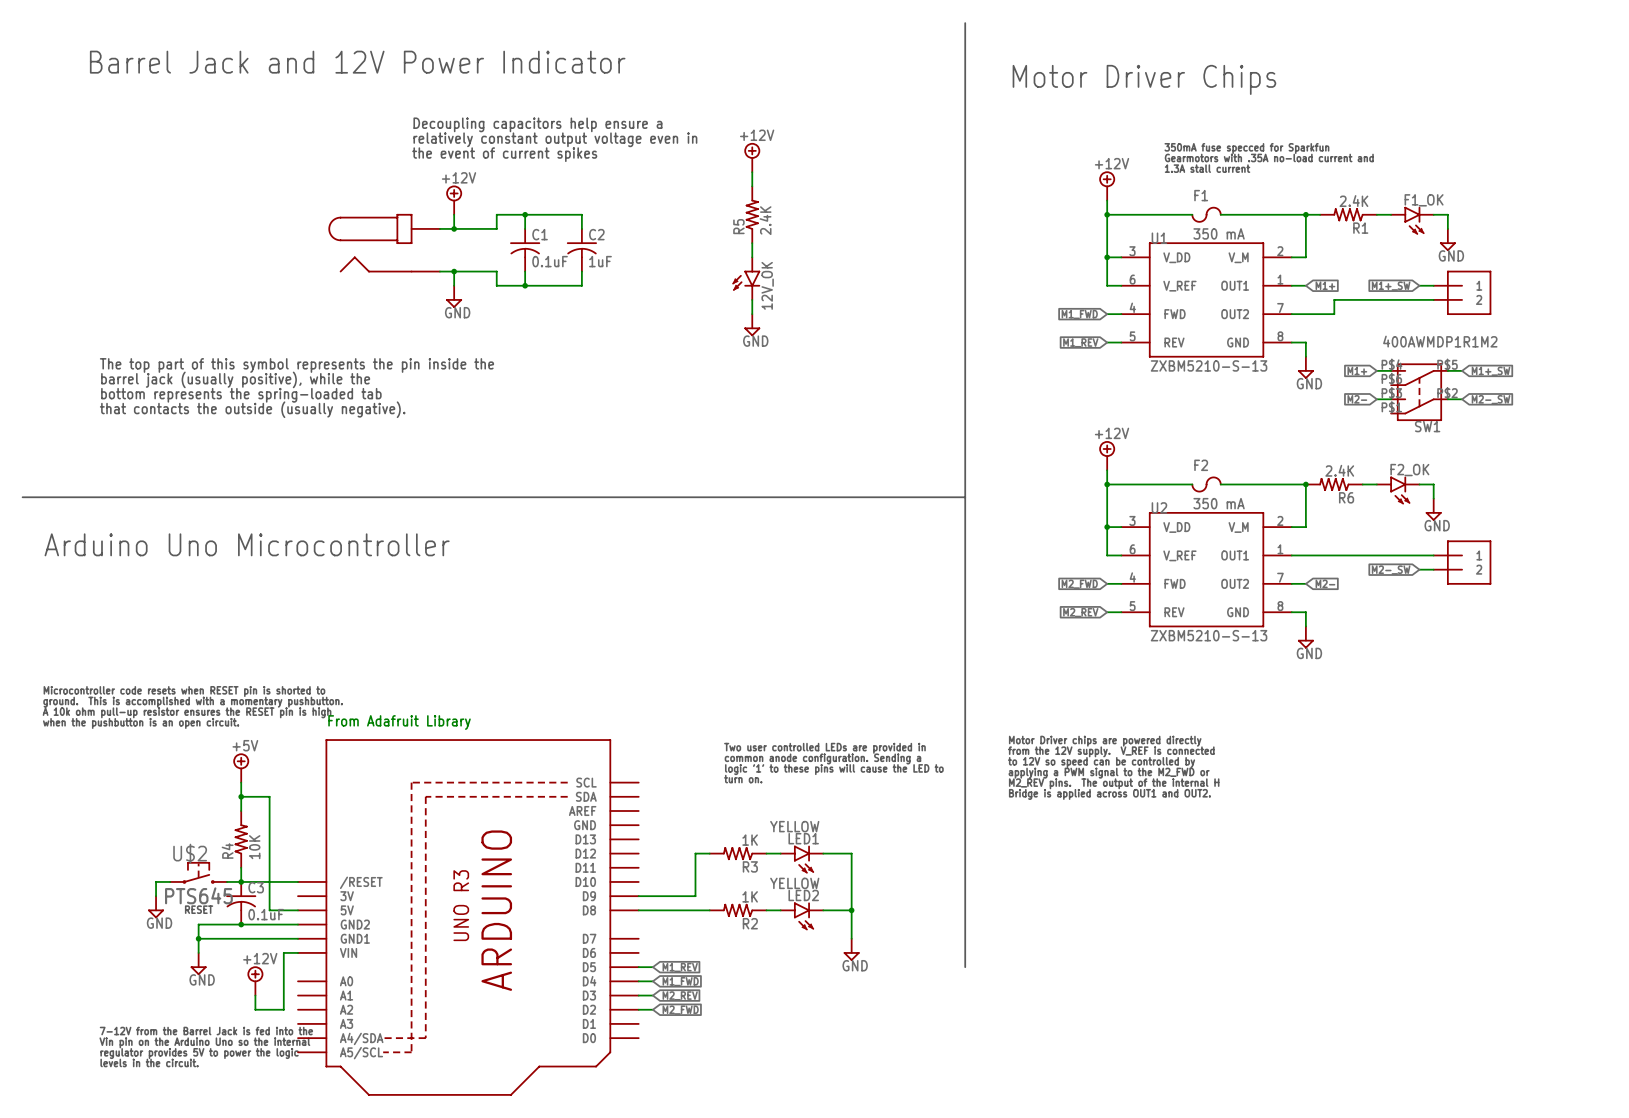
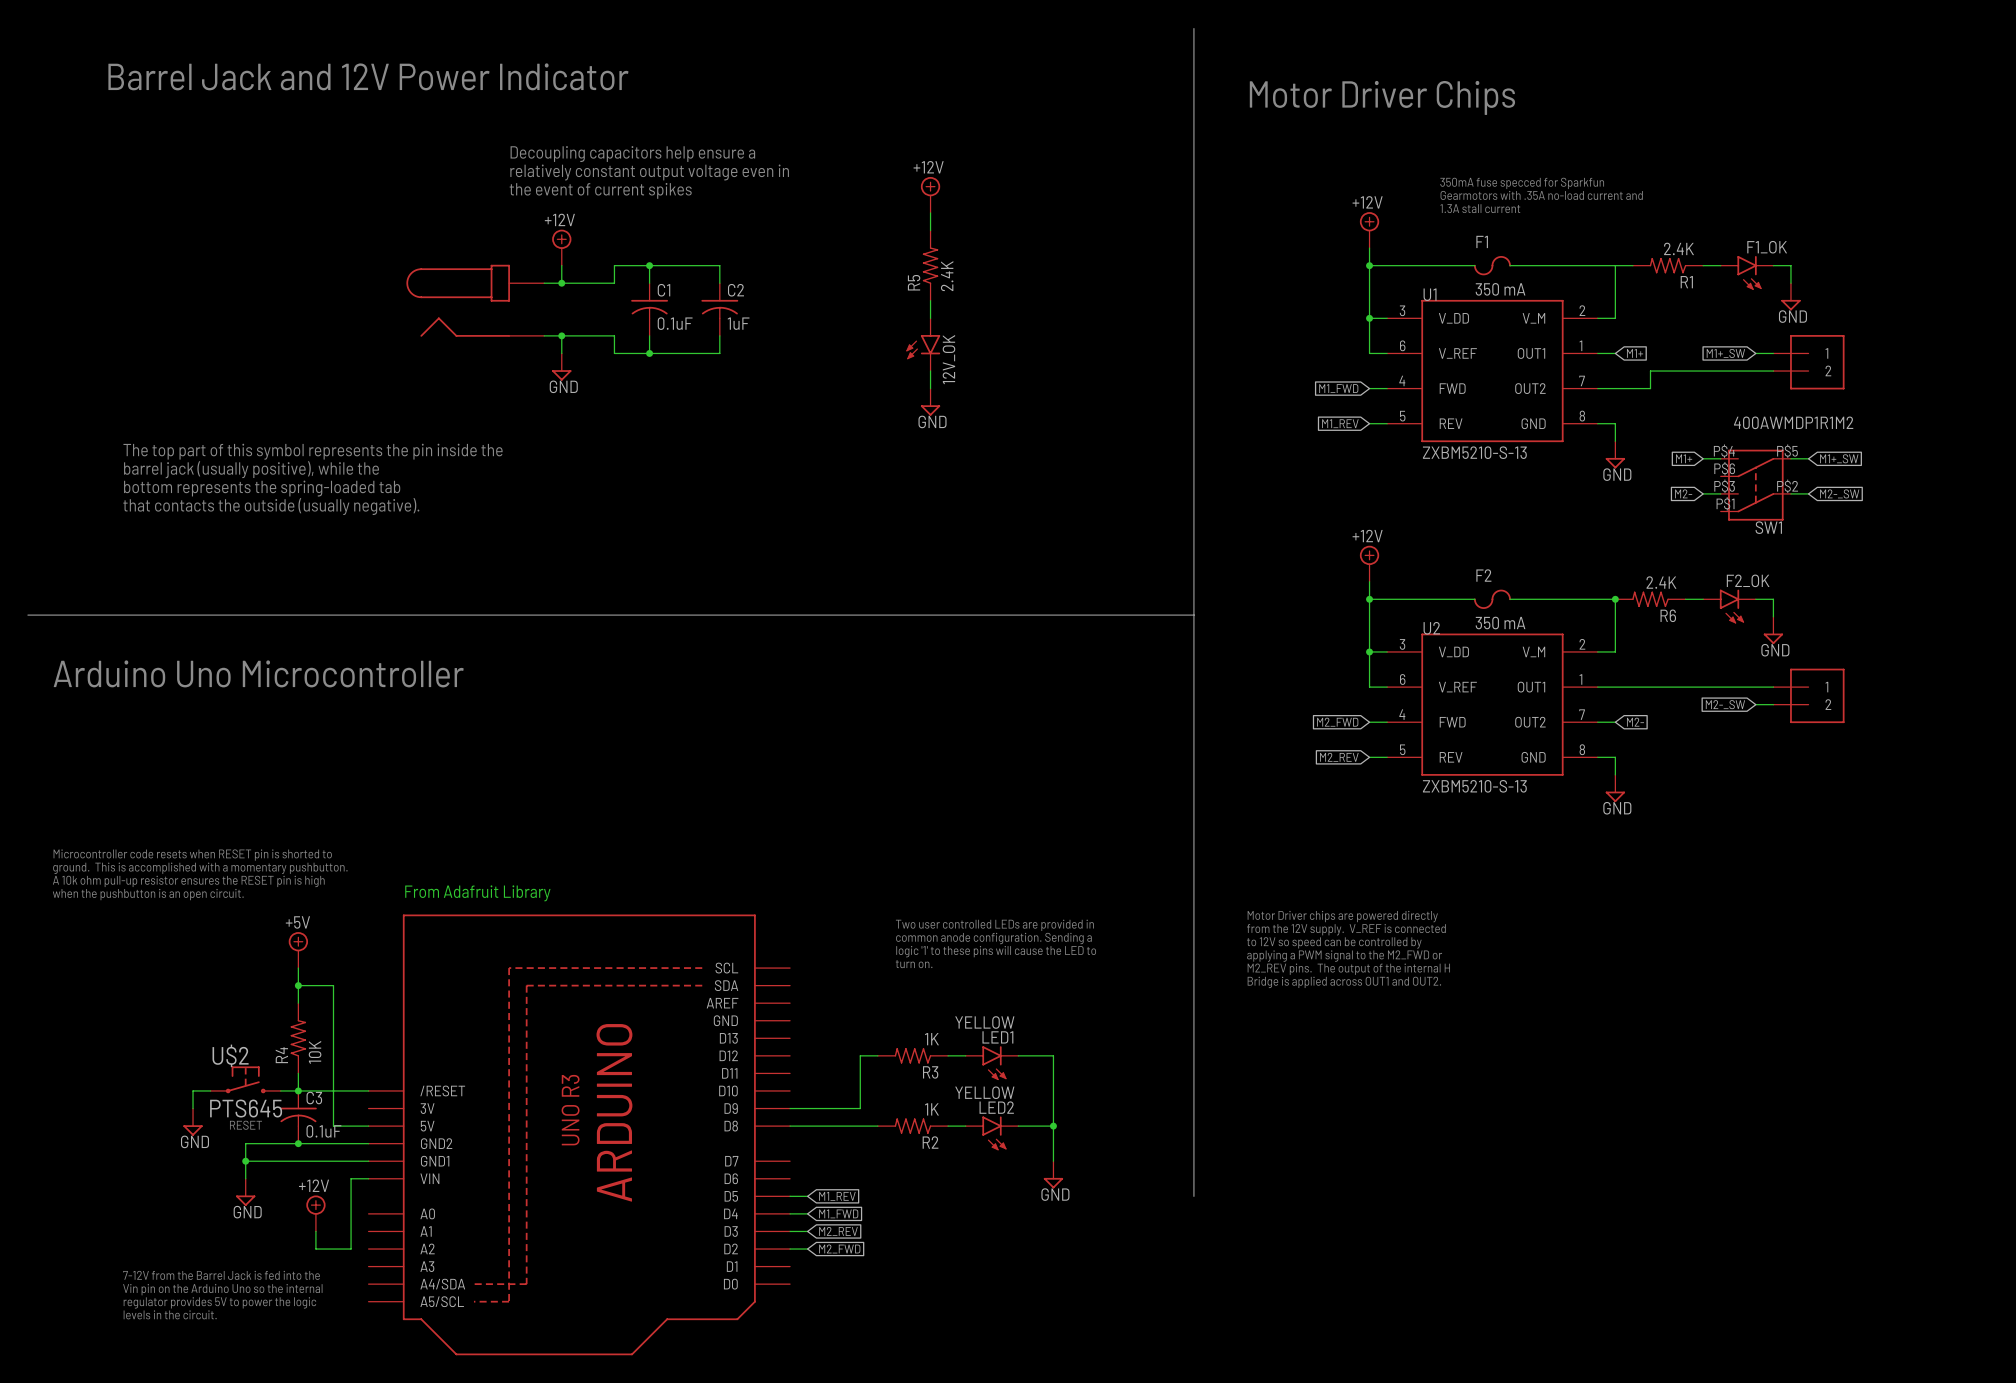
junction: (1305, 214) -> none

